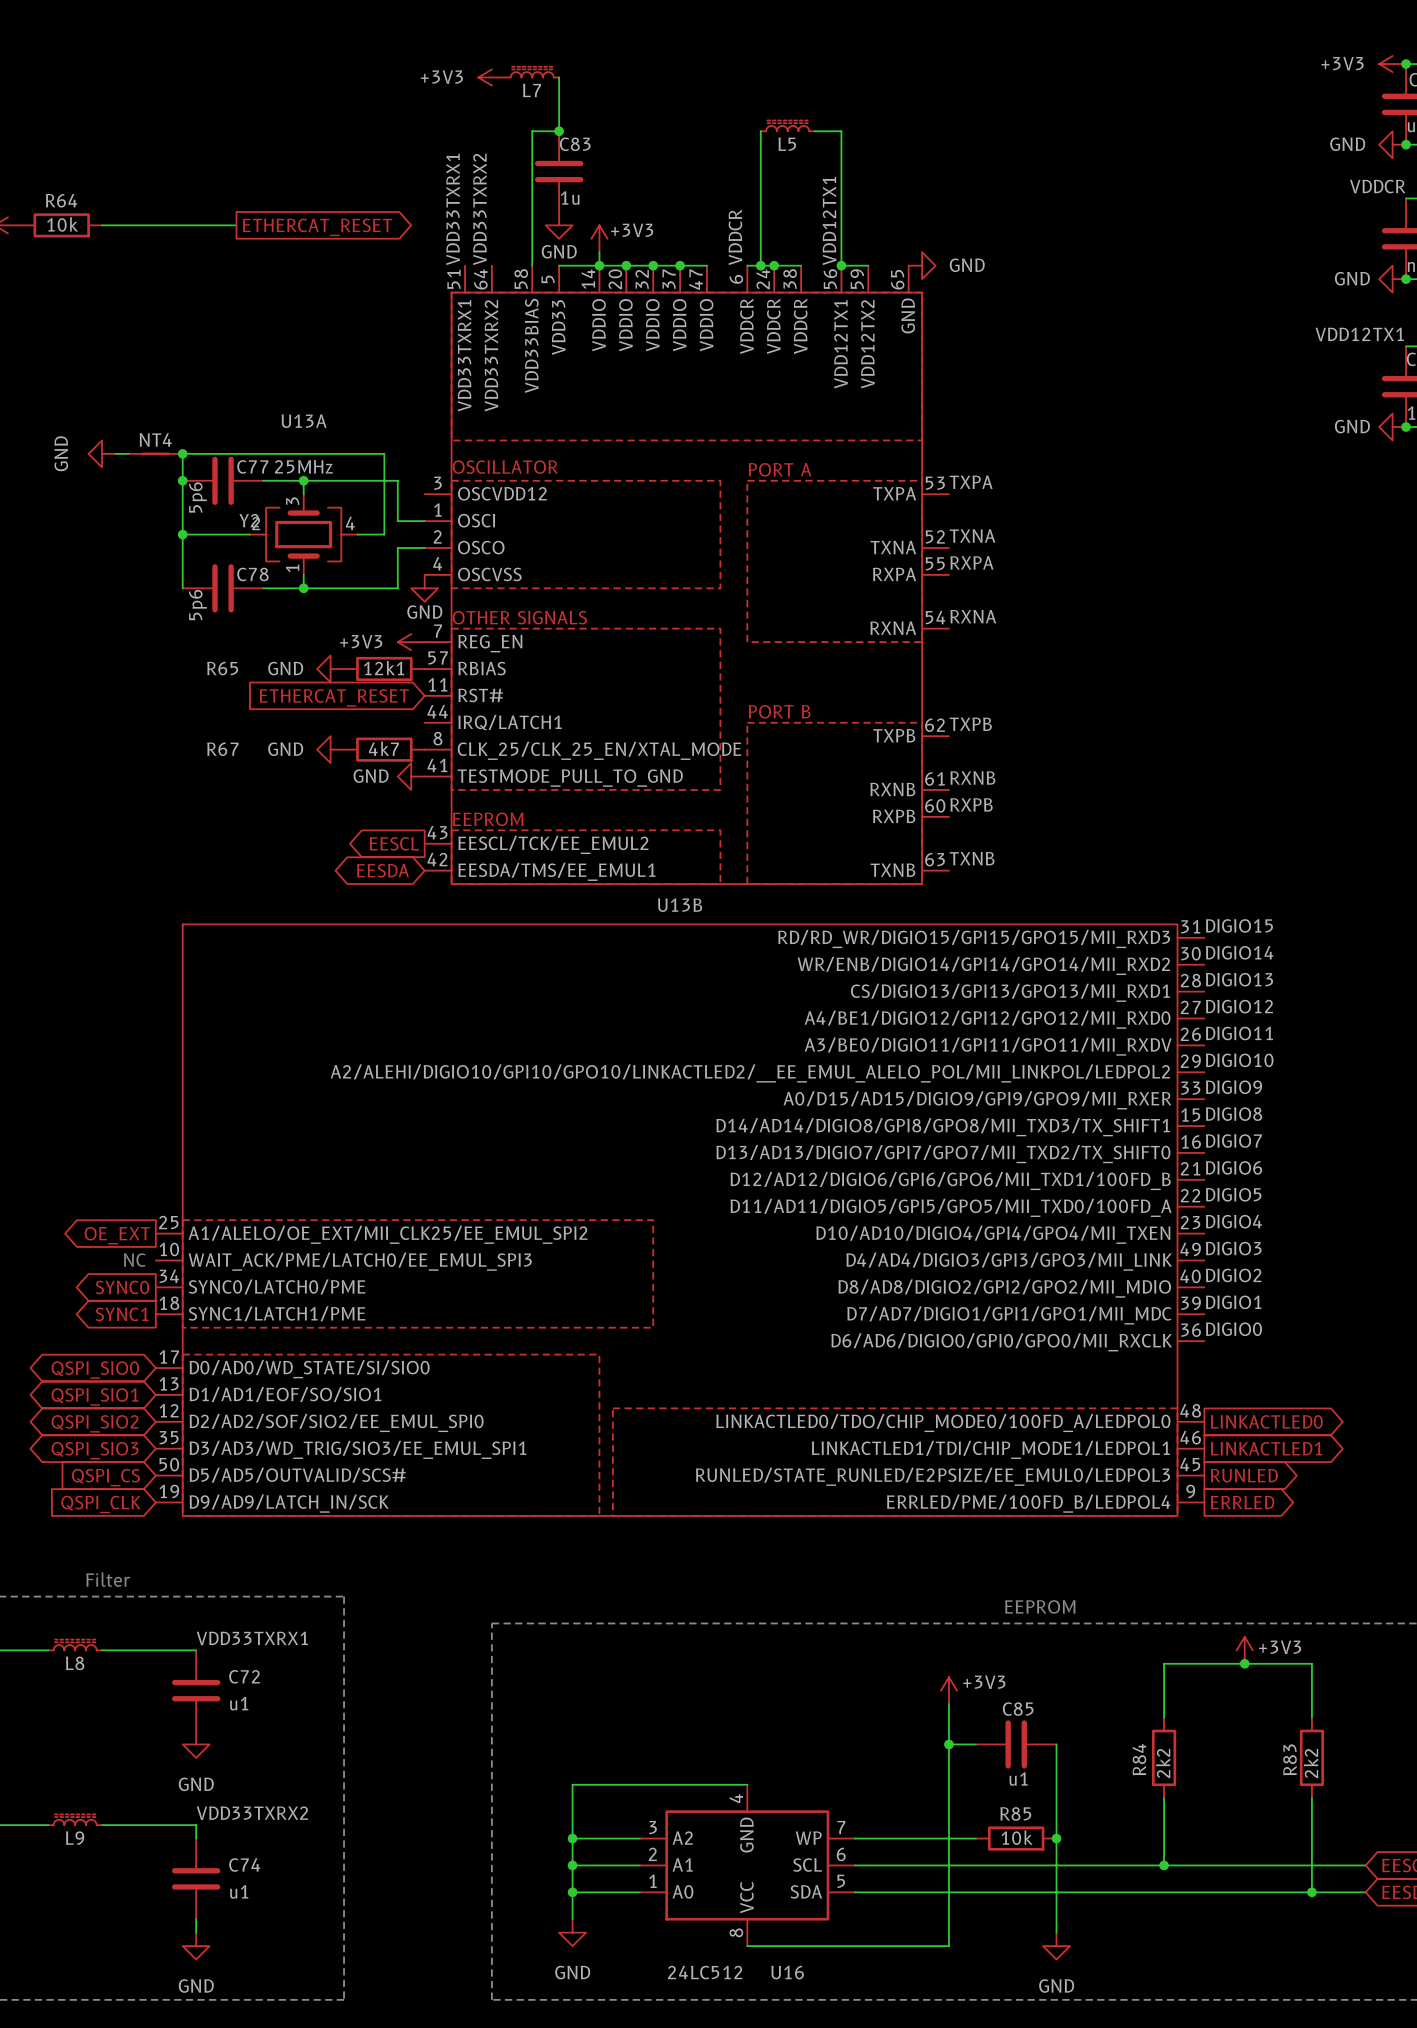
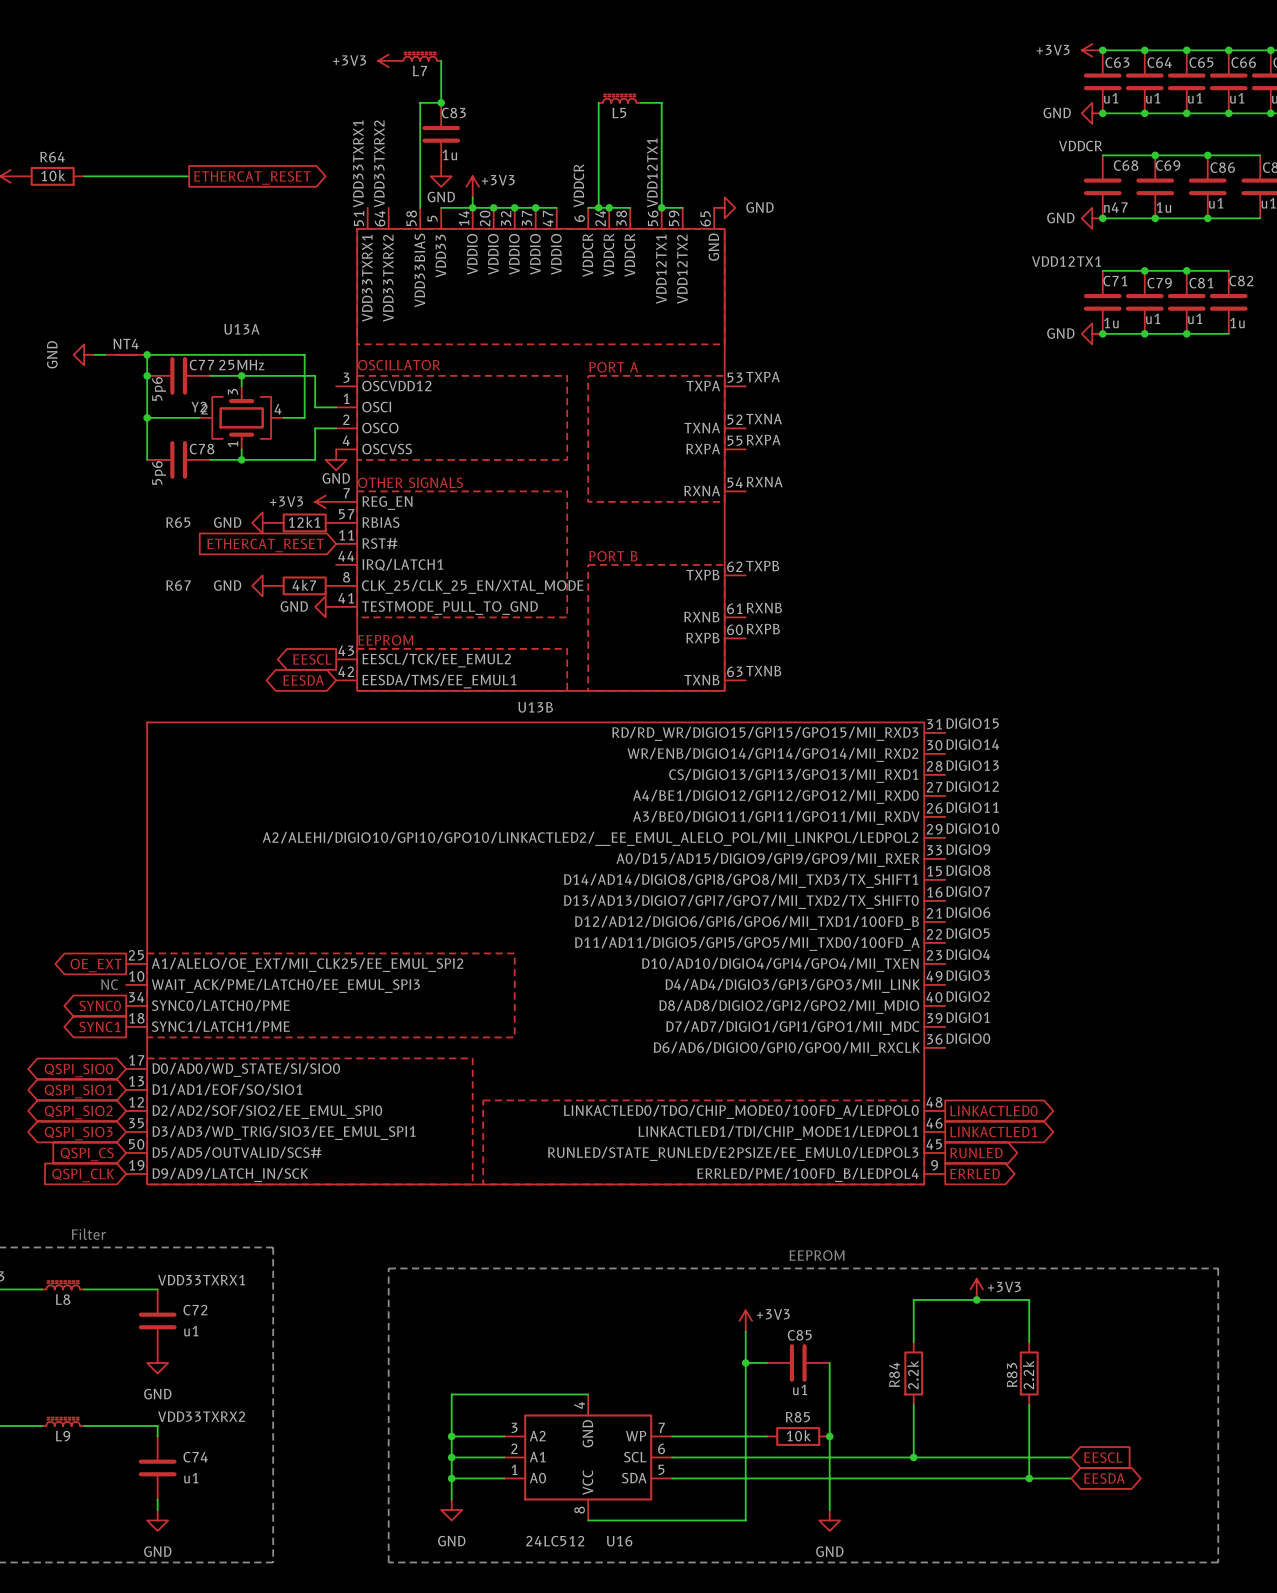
R84 value: 2k2 (1163, 1763) -> 2.2k (913, 1374)
R83 value: 2k2 (1311, 1763) -> 2.2k (1028, 1374)

